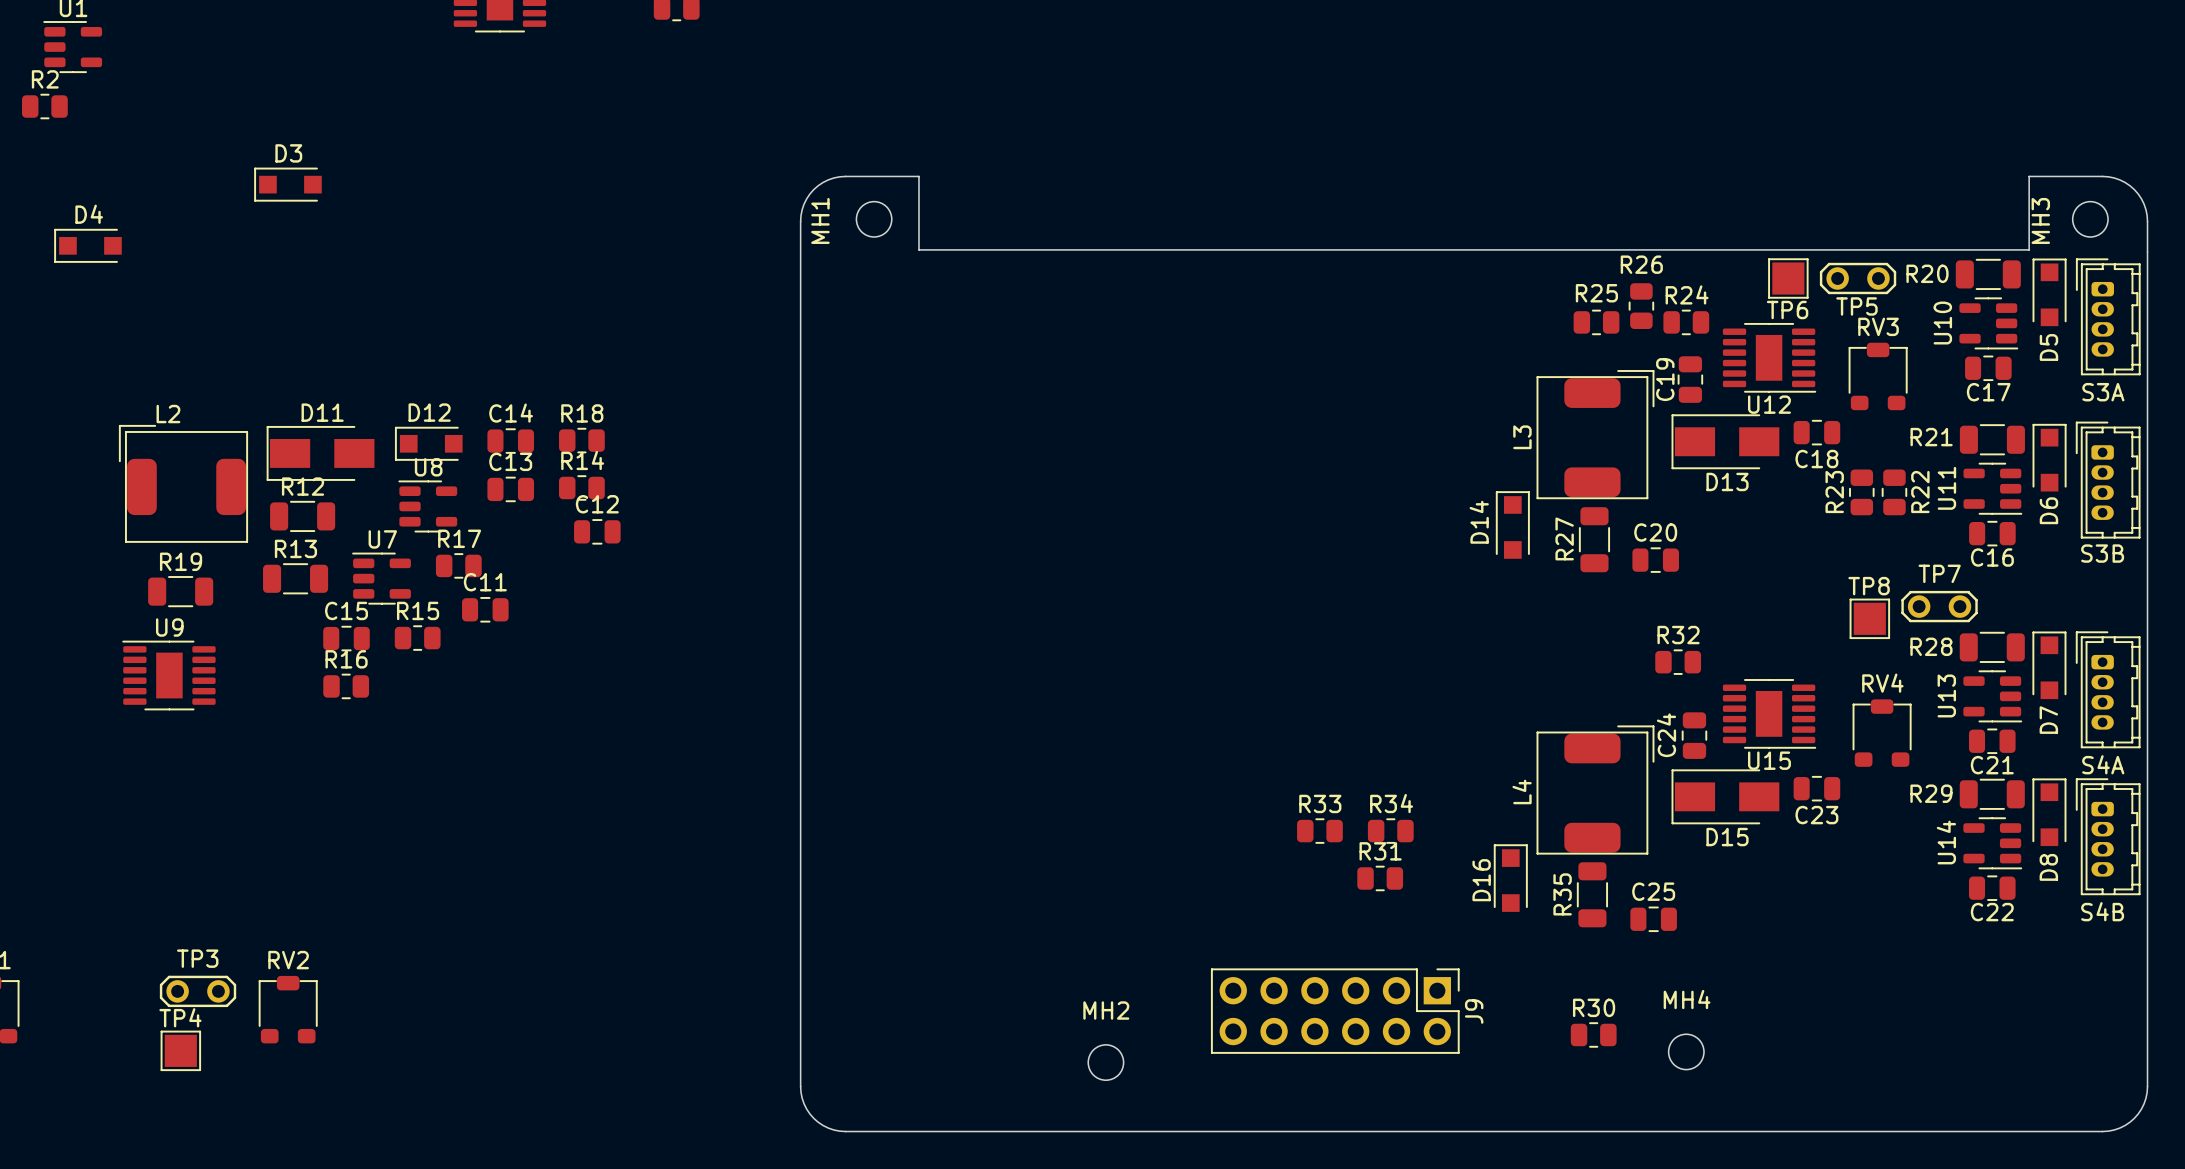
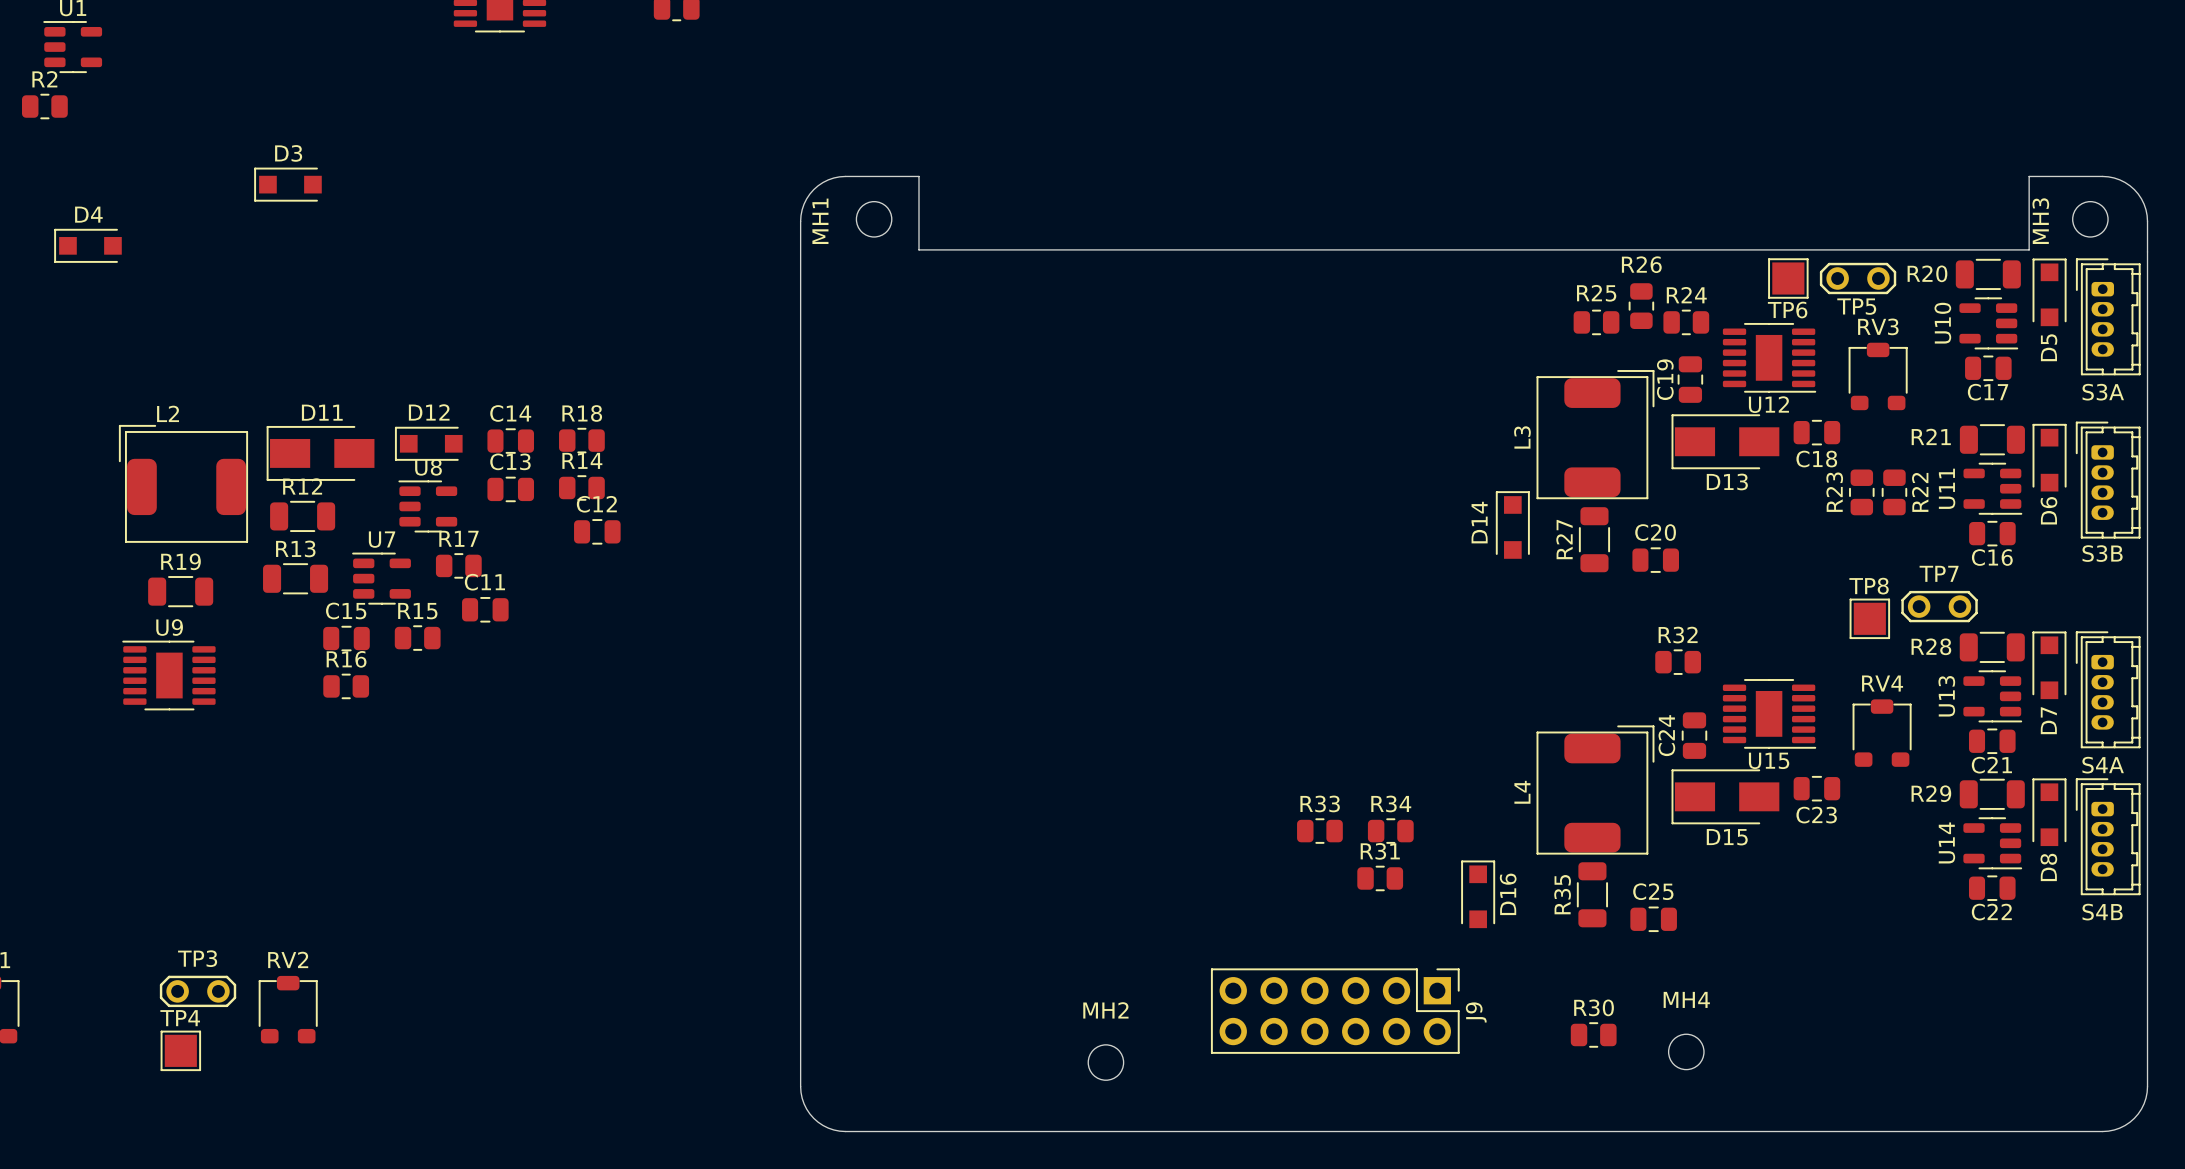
D16 position: (1510, 878) -> (1478, 894)
D16 name position: D16 (1481, 880) -> D16 (1508, 894)

